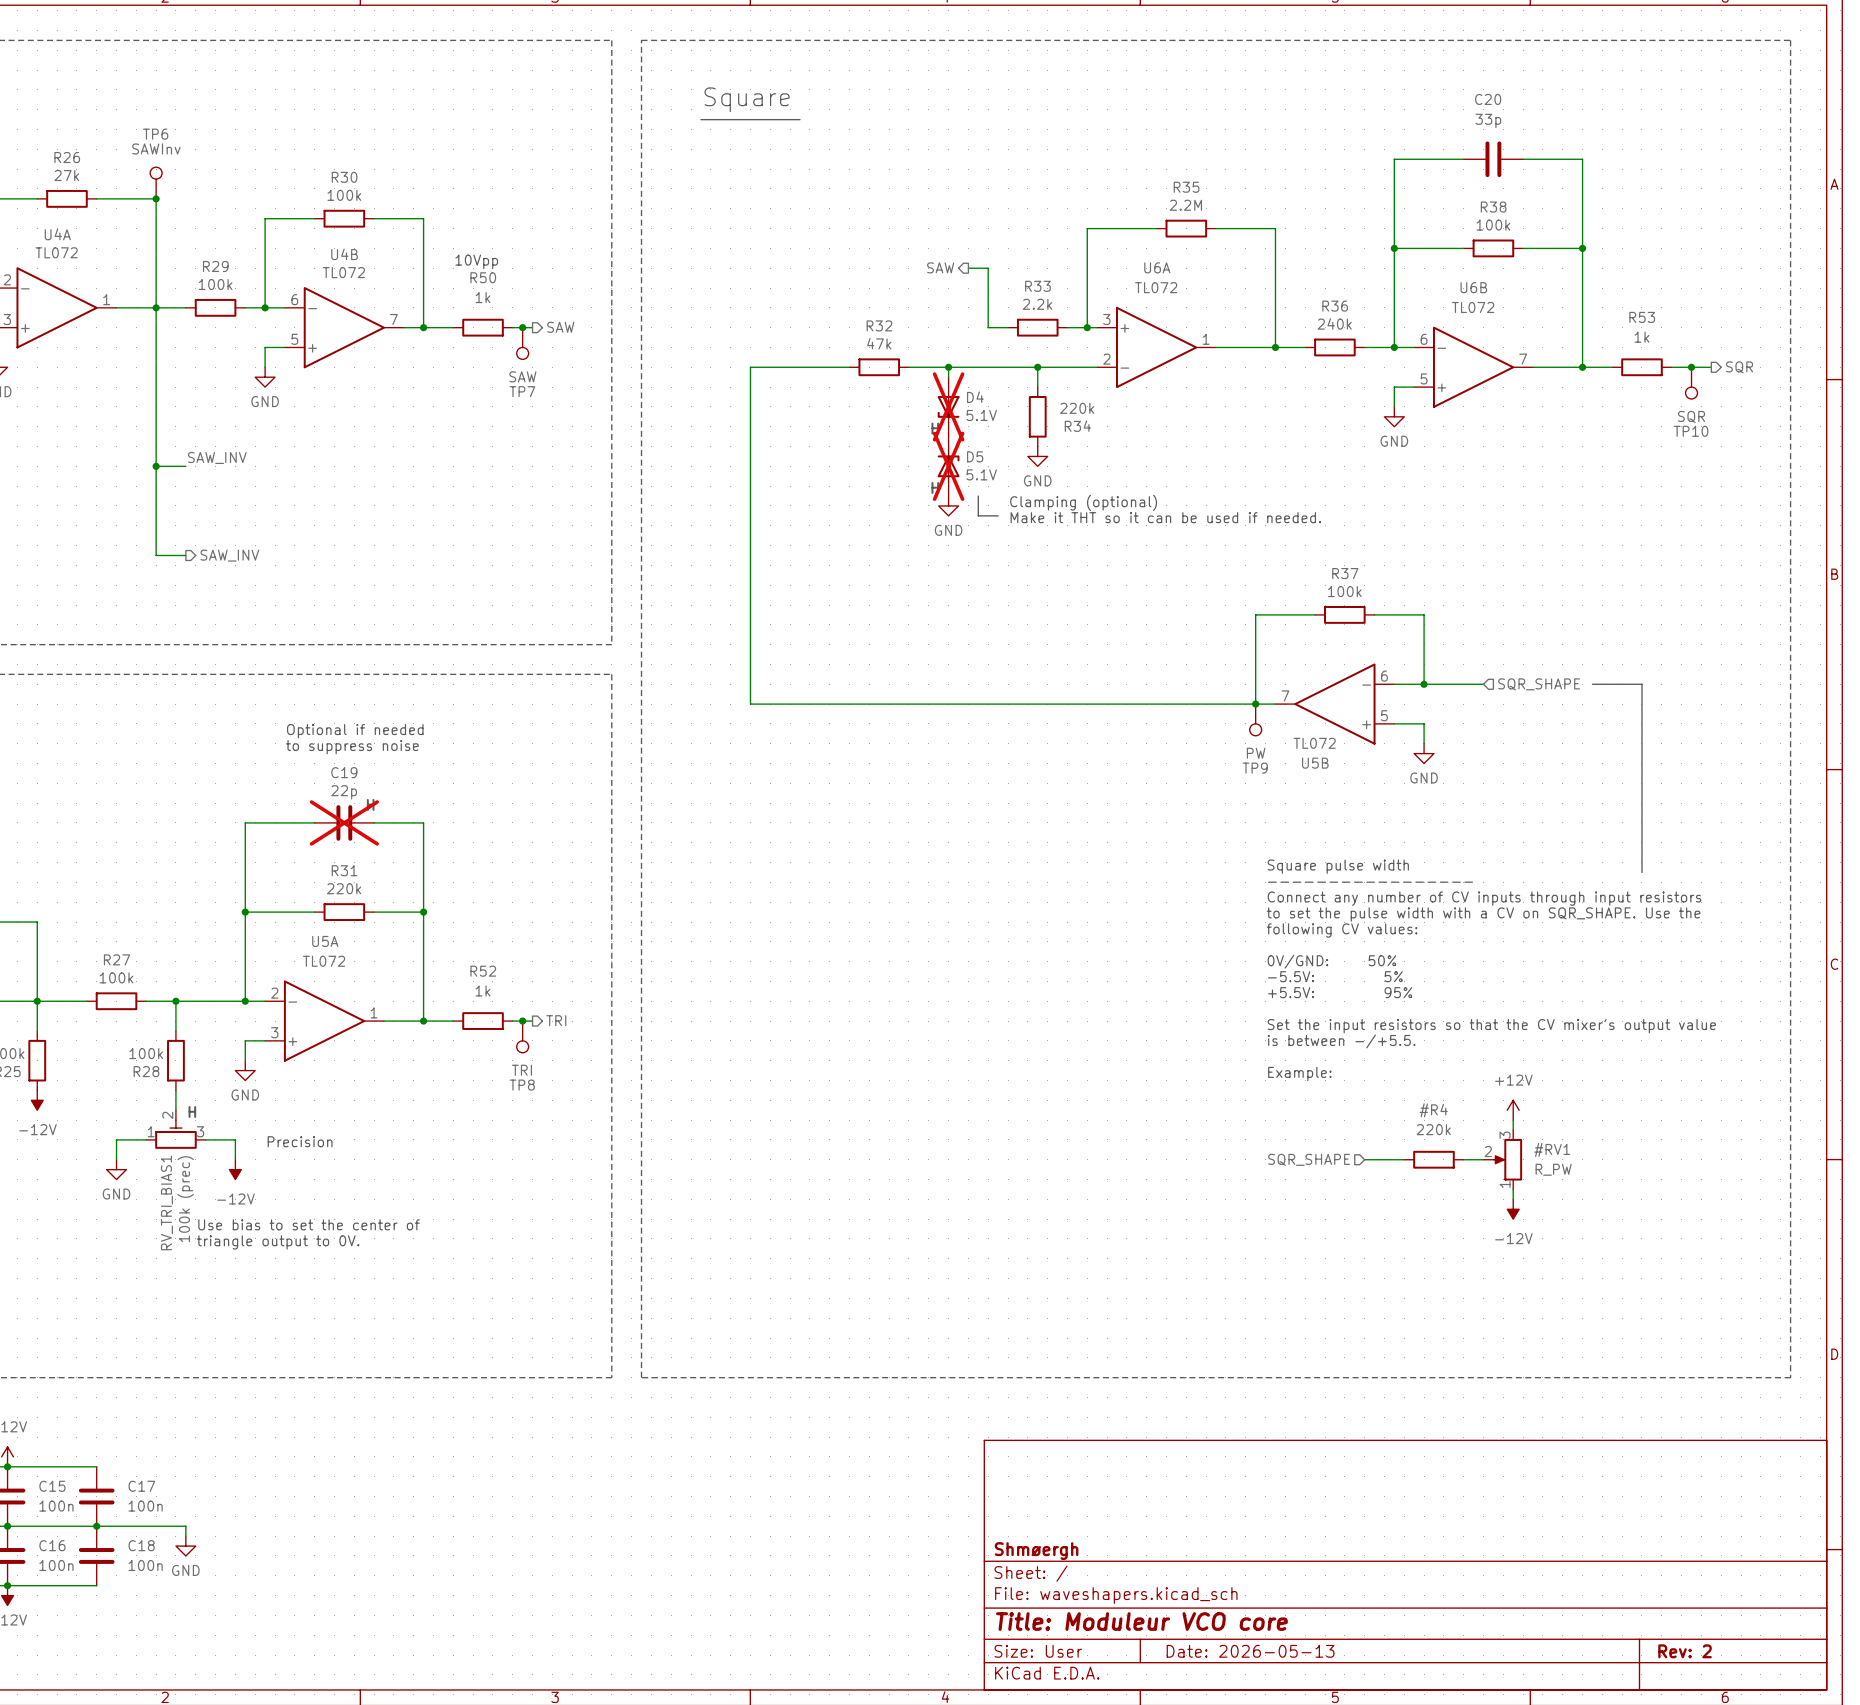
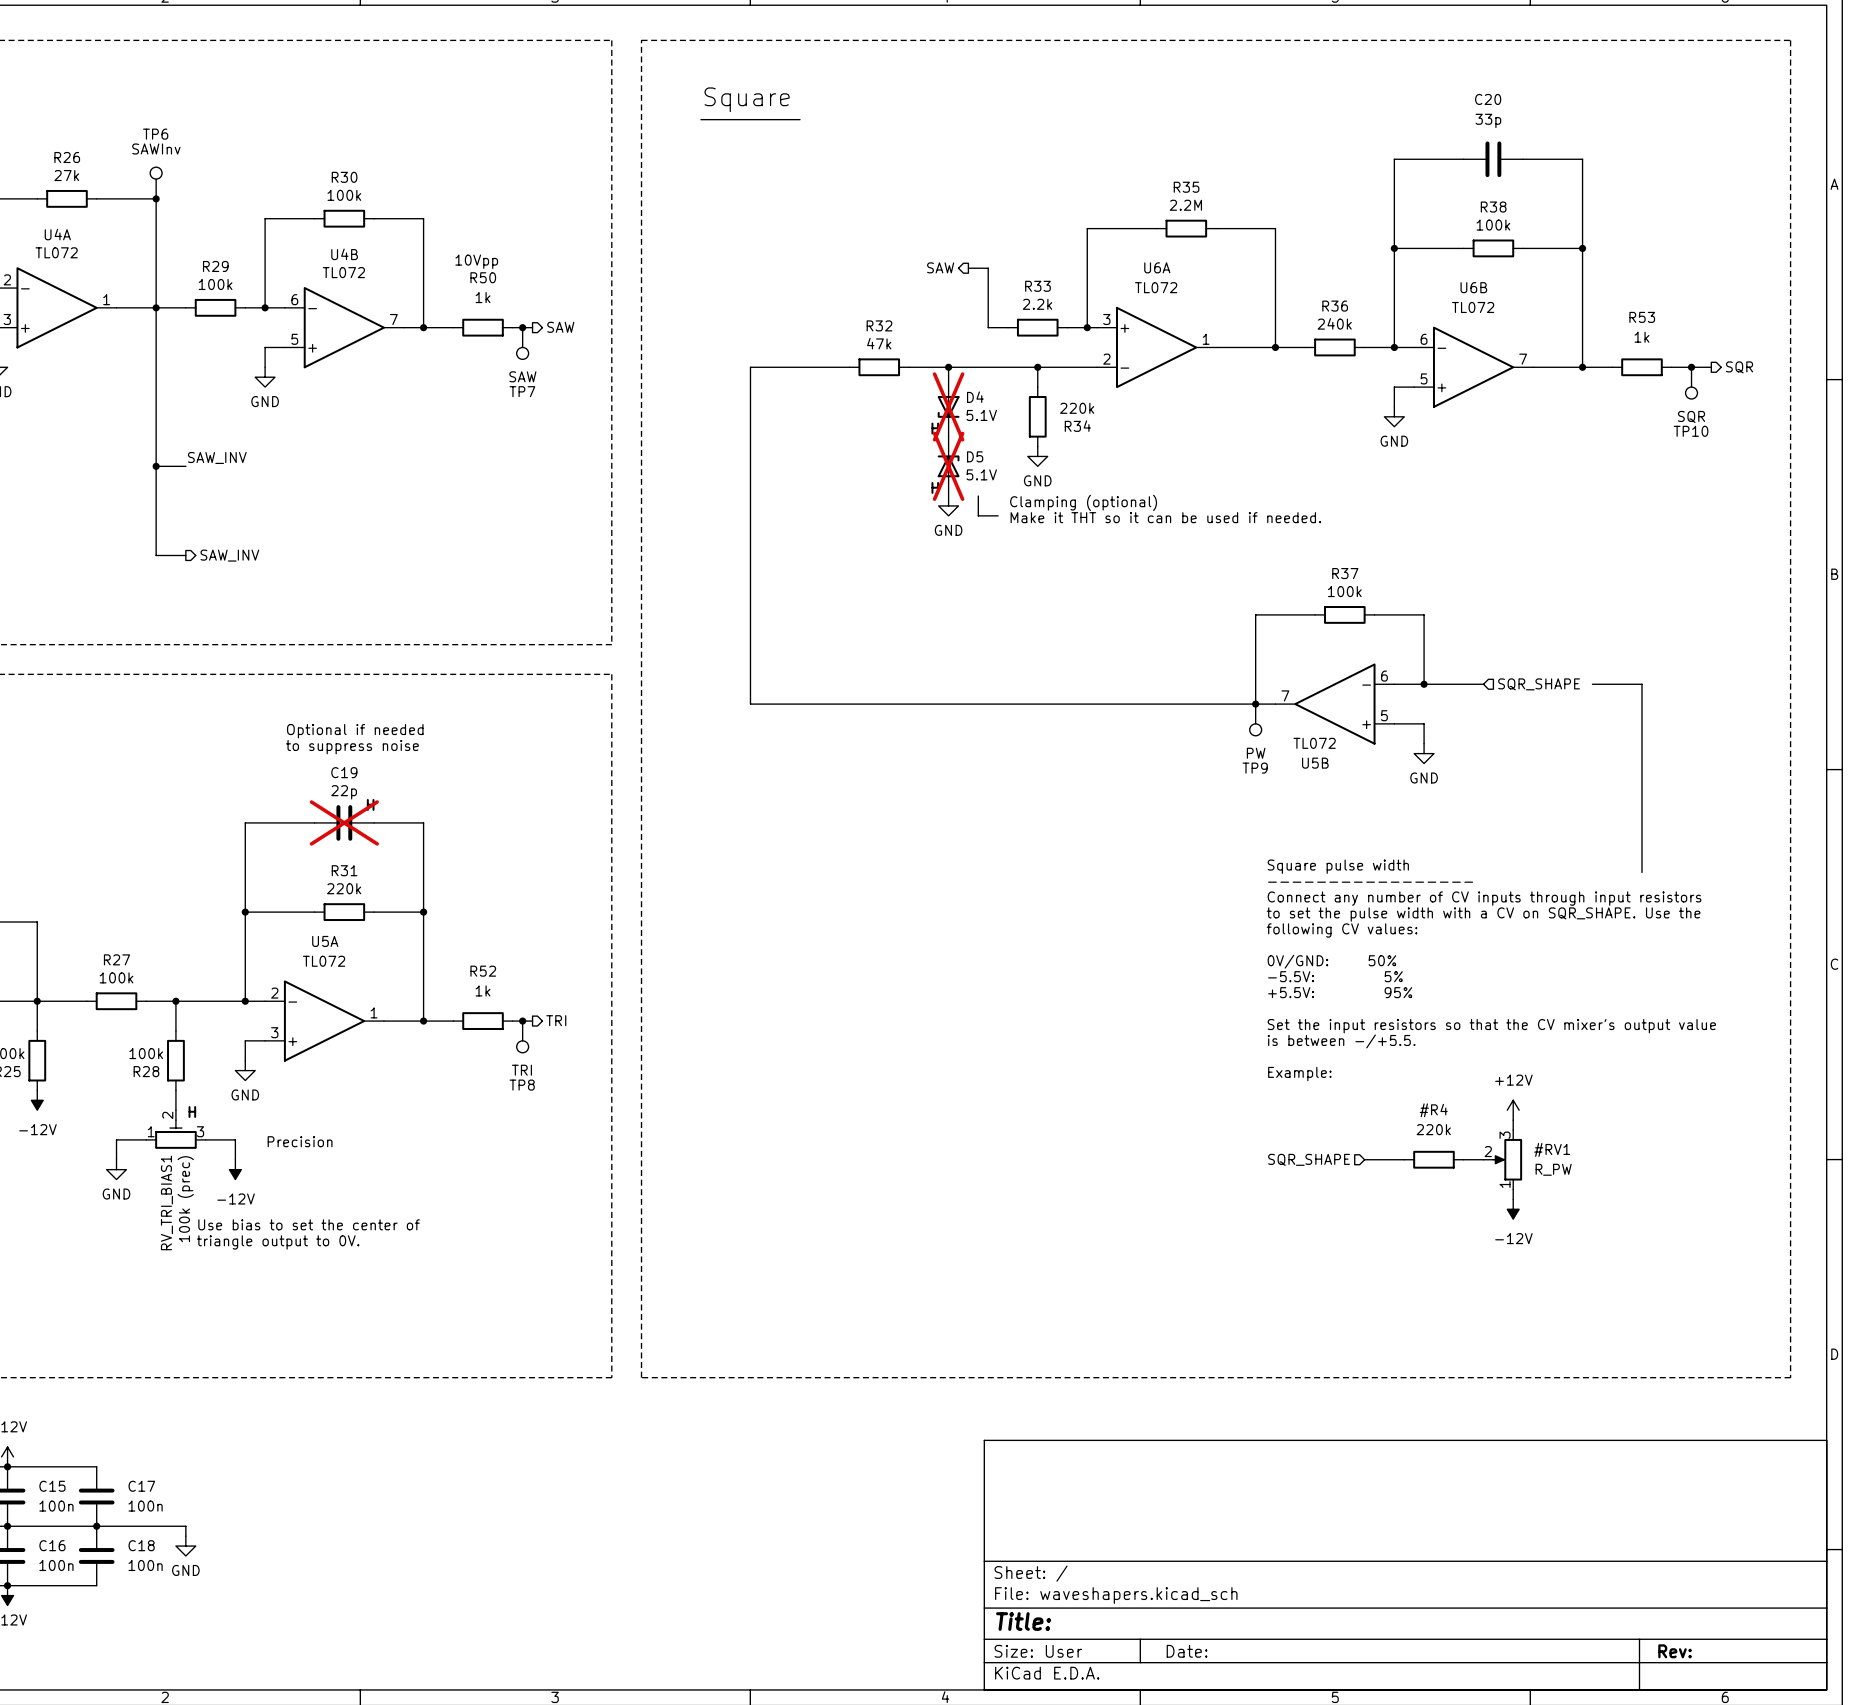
title block: Shmøergh (1036, 1551) -> none
title block: Title: Moduleur VCO core (1141, 1621) -> Title: (1023, 1621)
title block: Date: 2026-05-13 (1250, 1651) -> Date: (1187, 1651)
title block: Rev: 2 (1685, 1651) -> Rev: (1675, 1651)

